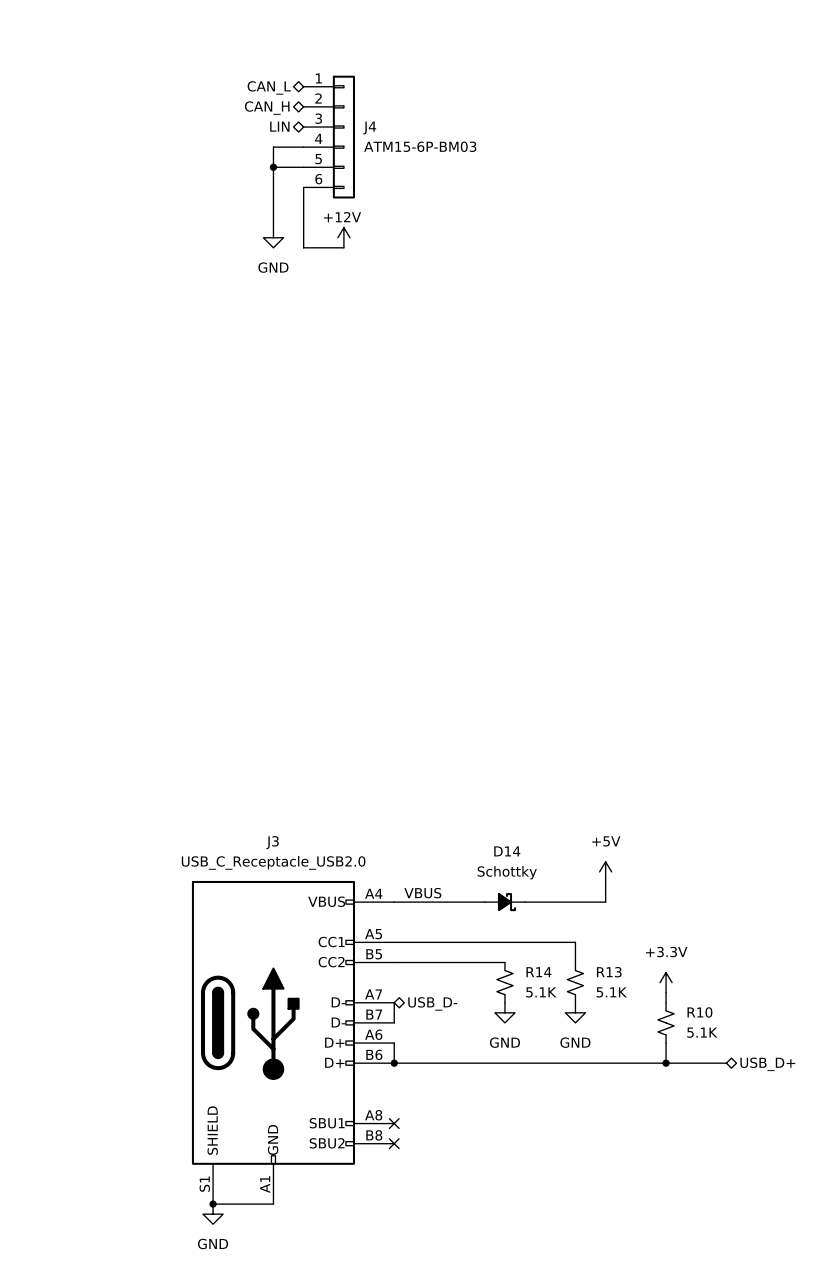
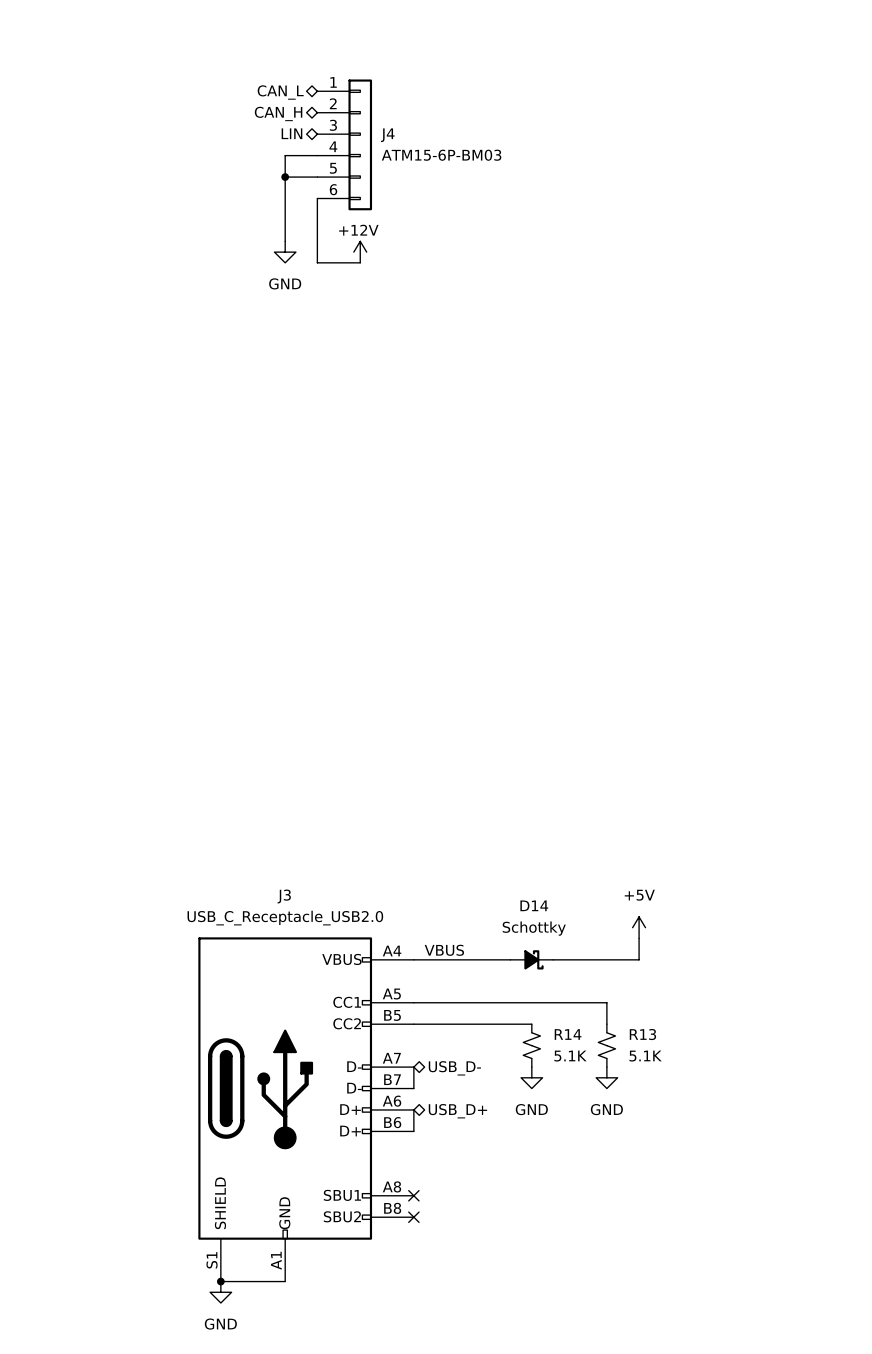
power symbol: +3.3V (666, 982) -> none
wire: (666, 992) (666, 1002) -> none
R10: 5.1K (666, 1022) -> none
wire: (666, 1043) (666, 1063) -> none
hierarchical label: none -> USB_D+ (457, 1111)
wire: (394, 1063) (726, 1063) -> none
junction: (394, 1063) -> none
junction: (666, 1063) -> none
hierarchical label: USB_D+ (767, 1064) -> none

